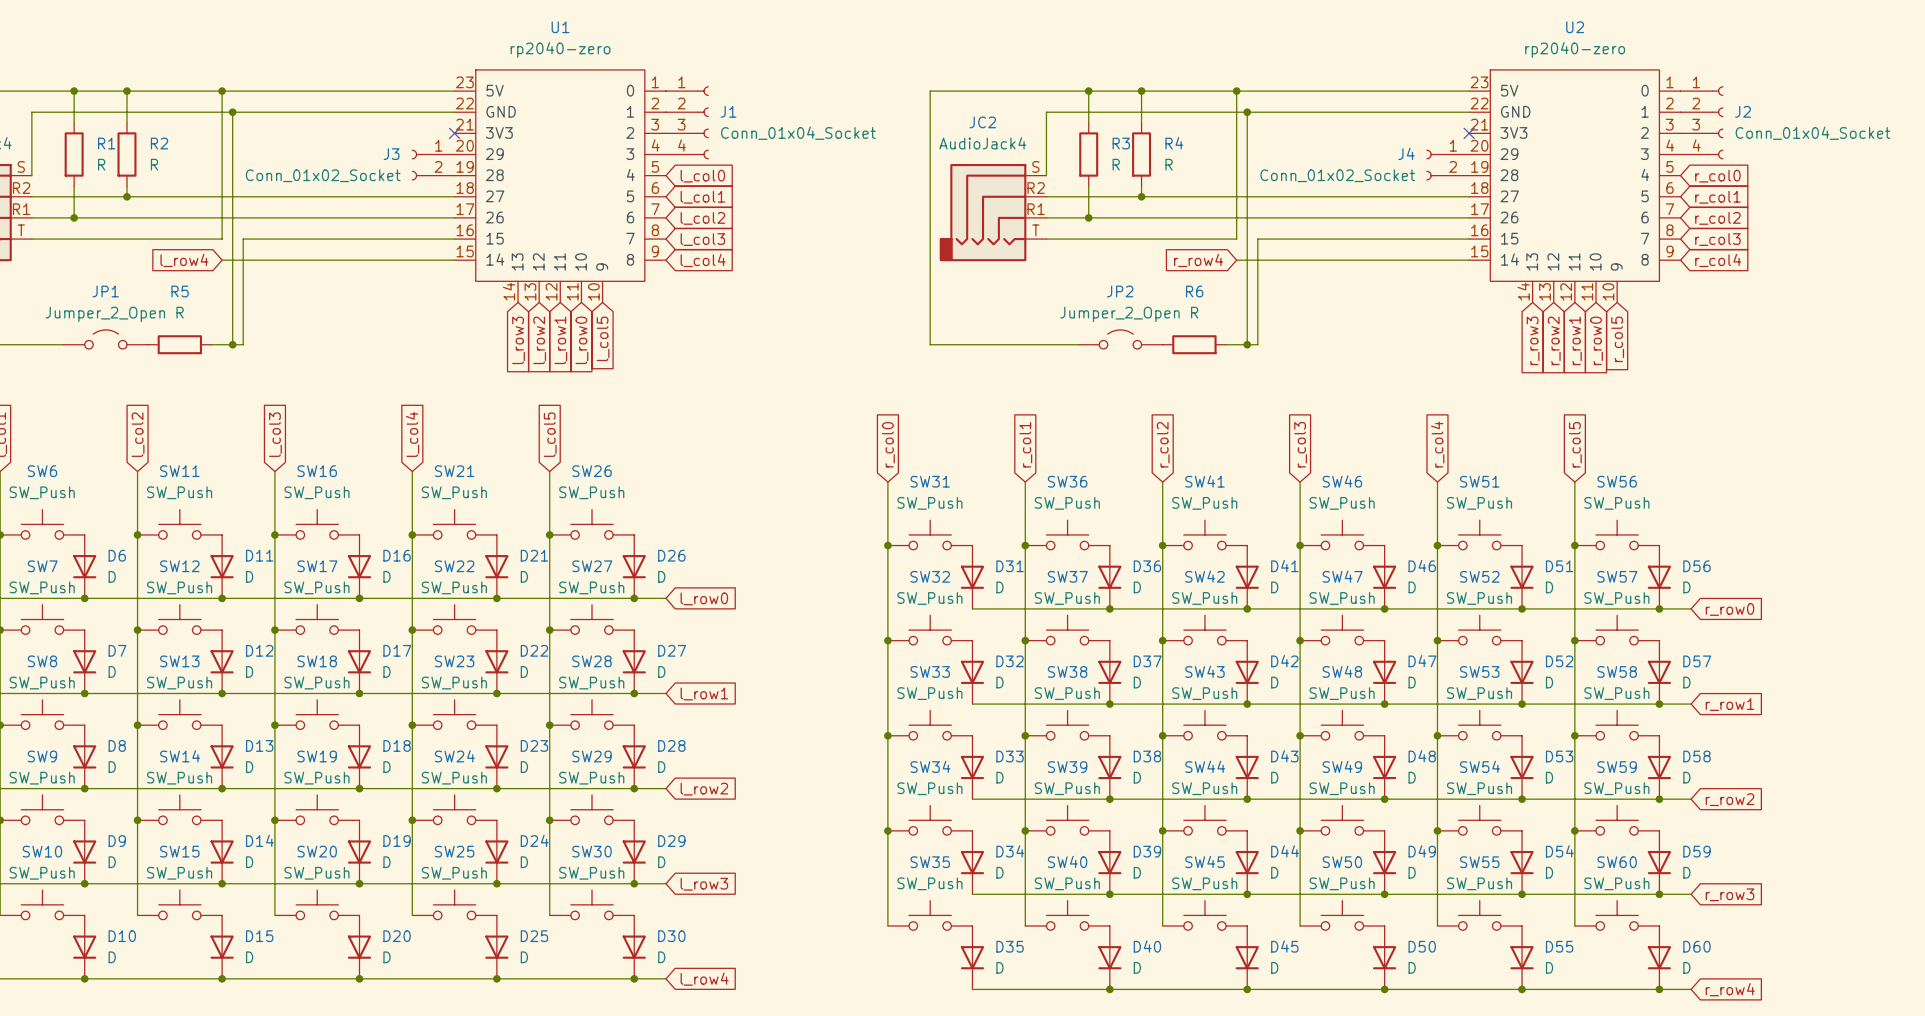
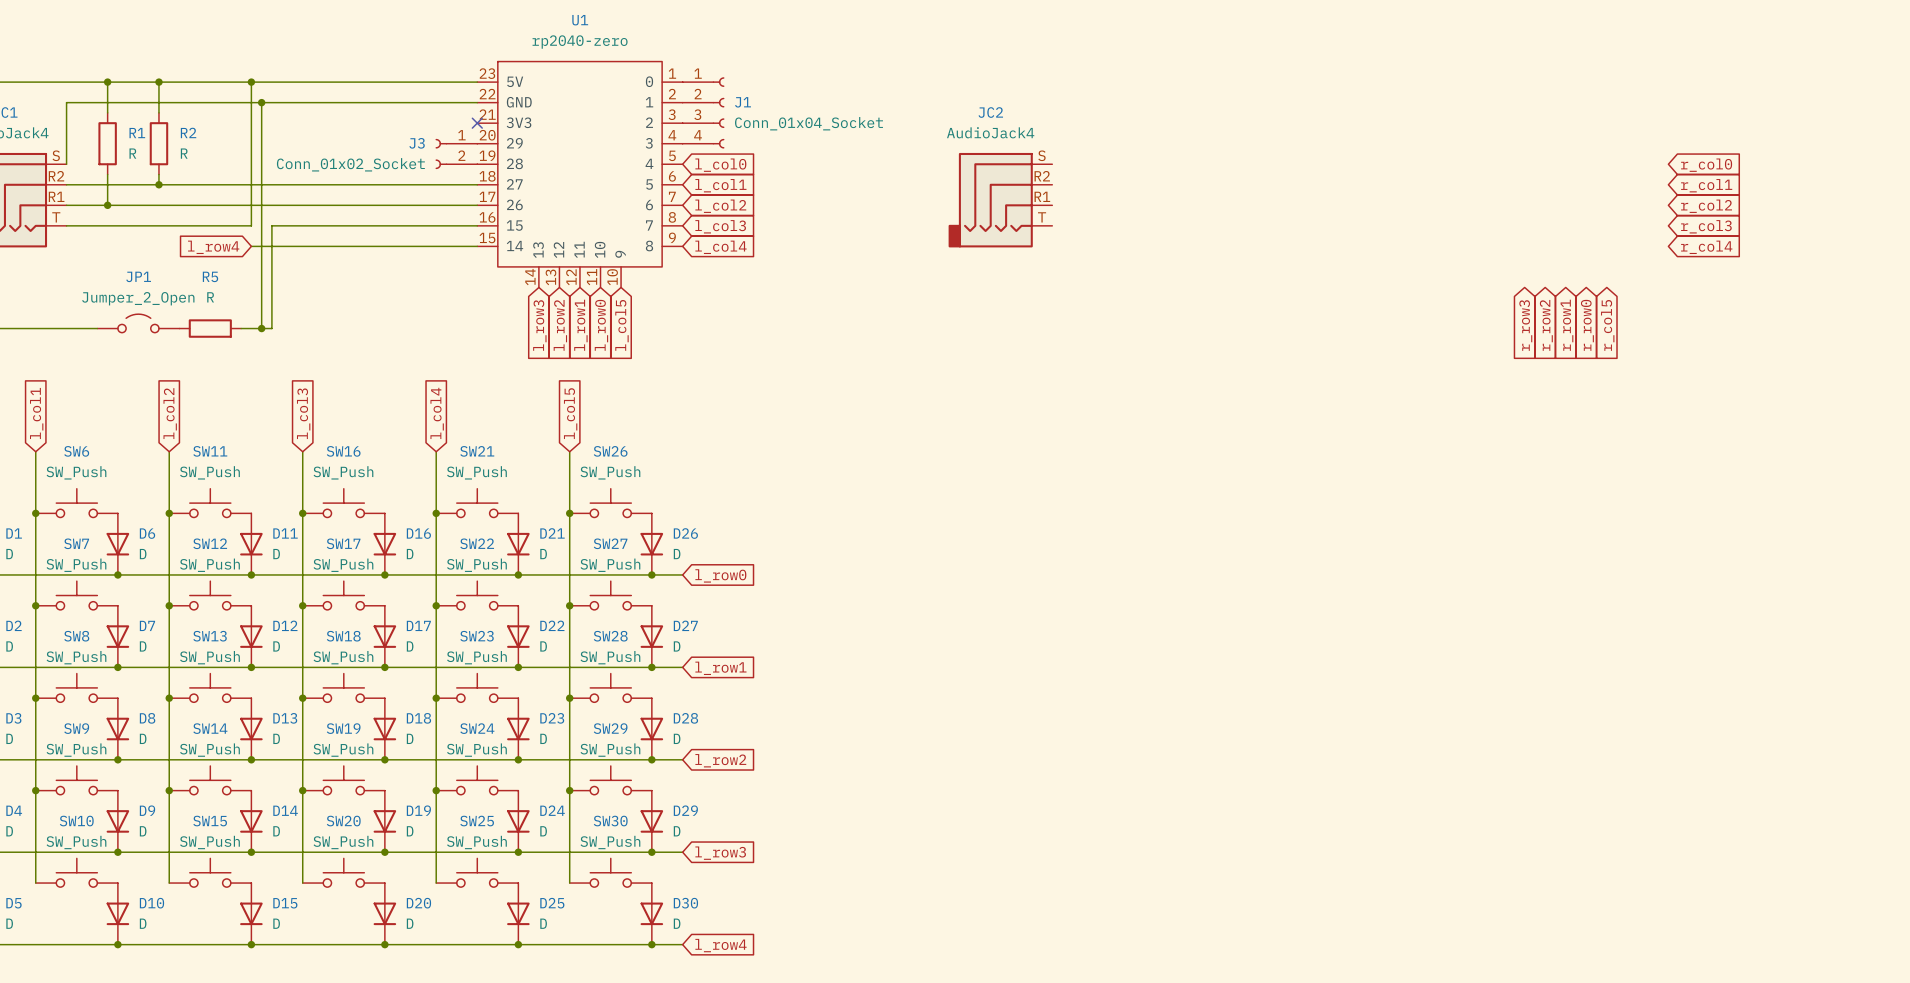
wire: (1088, 91) (1088, 122) -> none
junction: (1088, 91) -> none
wire: (1141, 91) (1141, 122) -> none
junction: (1141, 91) -> none
wire: (1236, 91) (1236, 239) (1046, 239) -> none
junction: (1236, 91) -> none
wire: (1469, 91) (930, 91) (930, 344) (1078, 344) -> none
wire: (1247, 112) (1247, 344) -> none
junction: (1247, 112) -> none
wire: (1469, 112) (1046, 112) (1046, 175) -> none
J2: Conn_01x04_Socket (1702, 122) -> none
no-connect mark: (1469, 133) -> none
R3: R (1088, 154) -> none
R4: R (1141, 154) -> none
J4: Conn_01x02_Socket (1447, 165) -> none
wire: (1088, 186) (1088, 217) -> none
wire: (1141, 186) (1141, 196) -> none
U2: rp2040-zero (1574, 186) -> none
wire: (1046, 196) (1469, 196) -> none
junction: (1141, 196) -> none
wire: (1046, 217) (1469, 217) -> none
junction: (1088, 217) -> none
wire: (1469, 239) (1257, 239) (1257, 344) (1226, 344) -> none
global label: r_row4 (1198, 260) -> none
wire: (1236, 260) (1469, 260) -> none
JP2: Jumper_2_Open (1120, 339) -> none
R6: R (1194, 344) -> none
junction: (1247, 344) -> none
global label: r_col0 (888, 444) -> none
global label: r_col1 (1025, 444) -> none
global label: r_col2 (1163, 444) -> none
global label: r_col3 (1300, 444) -> none
global label: r_col4 (1437, 444) -> none
global label: r_col5 (1575, 444) -> none
wire: (887, 482) (887, 926) -> none
wire: (1025, 482) (1025, 926) -> none
wire: (1162, 482) (1162, 926) -> none
wire: (1300, 482) (1300, 926) -> none
wire: (1437, 482) (1437, 926) -> none
wire: (1574, 482) (1574, 926) -> none
SW31: SW_Push (930, 534) -> none
SW36: SW_Push (1067, 534) -> none
SW41: SW_Push (1204, 534) -> none
SW46: SW_Push (1342, 534) -> none
SW51: SW_Push (1479, 534) -> none
SW56: SW_Push (1617, 534) -> none
junction: (887, 545) -> none
junction: (1025, 545) -> none
junction: (1162, 545) -> none
junction: (1300, 545) -> none
junction: (1437, 545) -> none
junction: (1574, 545) -> none
D31: D (972, 577) -> none
D36: D (1109, 577) -> none
D41: D (1247, 577) -> none
D46: D (1384, 577) -> none
D51: D (1522, 577) -> none
D56: D (1659, 577) -> none
wire: (972, 608) (1691, 608) -> none
junction: (1109, 608) -> none
junction: (1247, 608) -> none
junction: (1384, 608) -> none
junction: (1522, 608) -> none
junction: (1659, 608) -> none
global label: r_row0 (1730, 609) -> none
SW32: SW_Push (930, 630) -> none
SW37: SW_Push (1067, 630) -> none
SW42: SW_Push (1204, 630) -> none
SW47: SW_Push (1342, 630) -> none
SW52: SW_Push (1479, 630) -> none
SW57: SW_Push (1617, 630) -> none
junction: (887, 640) -> none
junction: (1025, 640) -> none
junction: (1162, 640) -> none
junction: (1300, 640) -> none
junction: (1437, 640) -> none
junction: (1574, 640) -> none
D32: D (972, 672) -> none
D37: D (1109, 672) -> none
D42: D (1247, 672) -> none
D47: D (1384, 672) -> none
D52: D (1522, 672) -> none
D57: D (1659, 672) -> none
wire: (972, 704) (1691, 704) -> none
junction: (1109, 704) -> none
junction: (1247, 704) -> none
junction: (1384, 704) -> none
junction: (1522, 704) -> none
junction: (1659, 704) -> none
global label: r_row1 (1730, 704) -> none
SW33: SW_Push (930, 725) -> none
SW38: SW_Push (1067, 725) -> none
SW43: SW_Push (1204, 725) -> none
SW48: SW_Push (1342, 725) -> none
SW53: SW_Push (1479, 725) -> none
SW58: SW_Push (1617, 725) -> none
junction: (887, 735) -> none
junction: (1025, 735) -> none
junction: (1162, 735) -> none
junction: (1300, 735) -> none
junction: (1437, 735) -> none
junction: (1574, 735) -> none
D33: D (972, 767) -> none
D38: D (1109, 767) -> none
D43: D (1247, 767) -> none
D48: D (1384, 767) -> none
D53: D (1522, 767) -> none
D58: D (1659, 767) -> none
wire: (972, 799) (1691, 799) -> none
junction: (1109, 799) -> none
junction: (1247, 799) -> none
junction: (1384, 799) -> none
junction: (1522, 799) -> none
junction: (1659, 799) -> none
global label: r_row2 (1730, 799) -> none
SW34: SW_Push (930, 820) -> none
SW39: SW_Push (1067, 820) -> none
SW44: SW_Push (1204, 820) -> none
SW49: SW_Push (1342, 820) -> none
SW54: SW_Push (1479, 820) -> none
SW59: SW_Push (1617, 820) -> none
junction: (887, 830) -> none
junction: (1025, 830) -> none
junction: (1162, 830) -> none
junction: (1300, 830) -> none
junction: (1437, 830) -> none
junction: (1574, 830) -> none
D34: D (972, 862) -> none
D39: D (1109, 862) -> none
D44: D (1247, 862) -> none
D49: D (1384, 862) -> none
D54: D (1522, 862) -> none
D59: D (1659, 862) -> none
wire: (972, 894) (1691, 894) -> none
junction: (1109, 894) -> none
junction: (1247, 894) -> none
junction: (1384, 894) -> none
junction: (1522, 894) -> none
junction: (1659, 894) -> none
global label: r_row3 (1730, 894) -> none
SW35: SW_Push (930, 915) -> none
SW40: SW_Push (1067, 915) -> none
SW45: SW_Push (1204, 915) -> none
SW50: SW_Push (1342, 915) -> none
SW55: SW_Push (1479, 915) -> none
SW60: SW_Push (1617, 915) -> none
D35: D (972, 957) -> none
D40: D (1109, 957) -> none
D45: D (1247, 957) -> none
D50: D (1384, 957) -> none
D55: D (1522, 957) -> none
D60: D (1659, 957) -> none
wire: (972, 989) (1691, 989) -> none
junction: (1109, 989) -> none
junction: (1247, 989) -> none
junction: (1384, 989) -> none
junction: (1522, 989) -> none
junction: (1659, 989) -> none
global label: r_row4 (1730, 989) -> none

